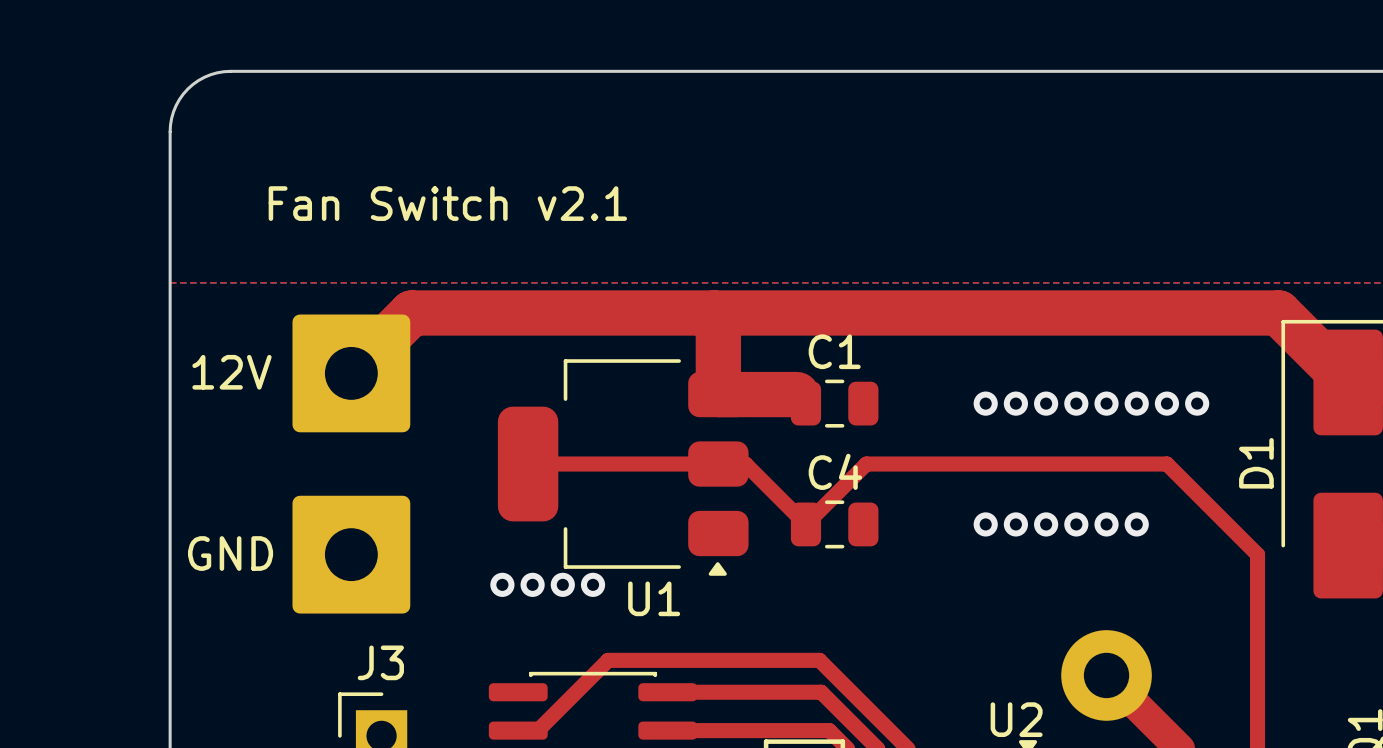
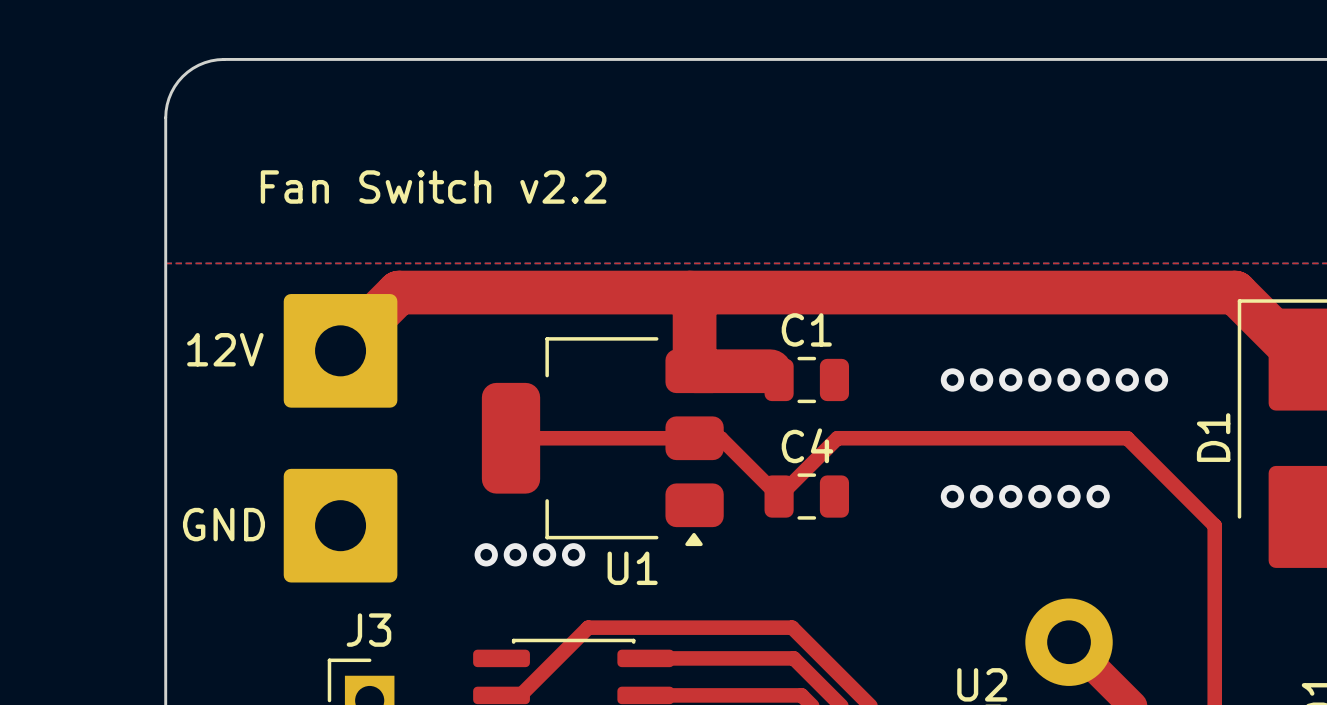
text: Fan Switch v2.1 (447, 203) -> Fan Switch v2.2 (433, 187)

